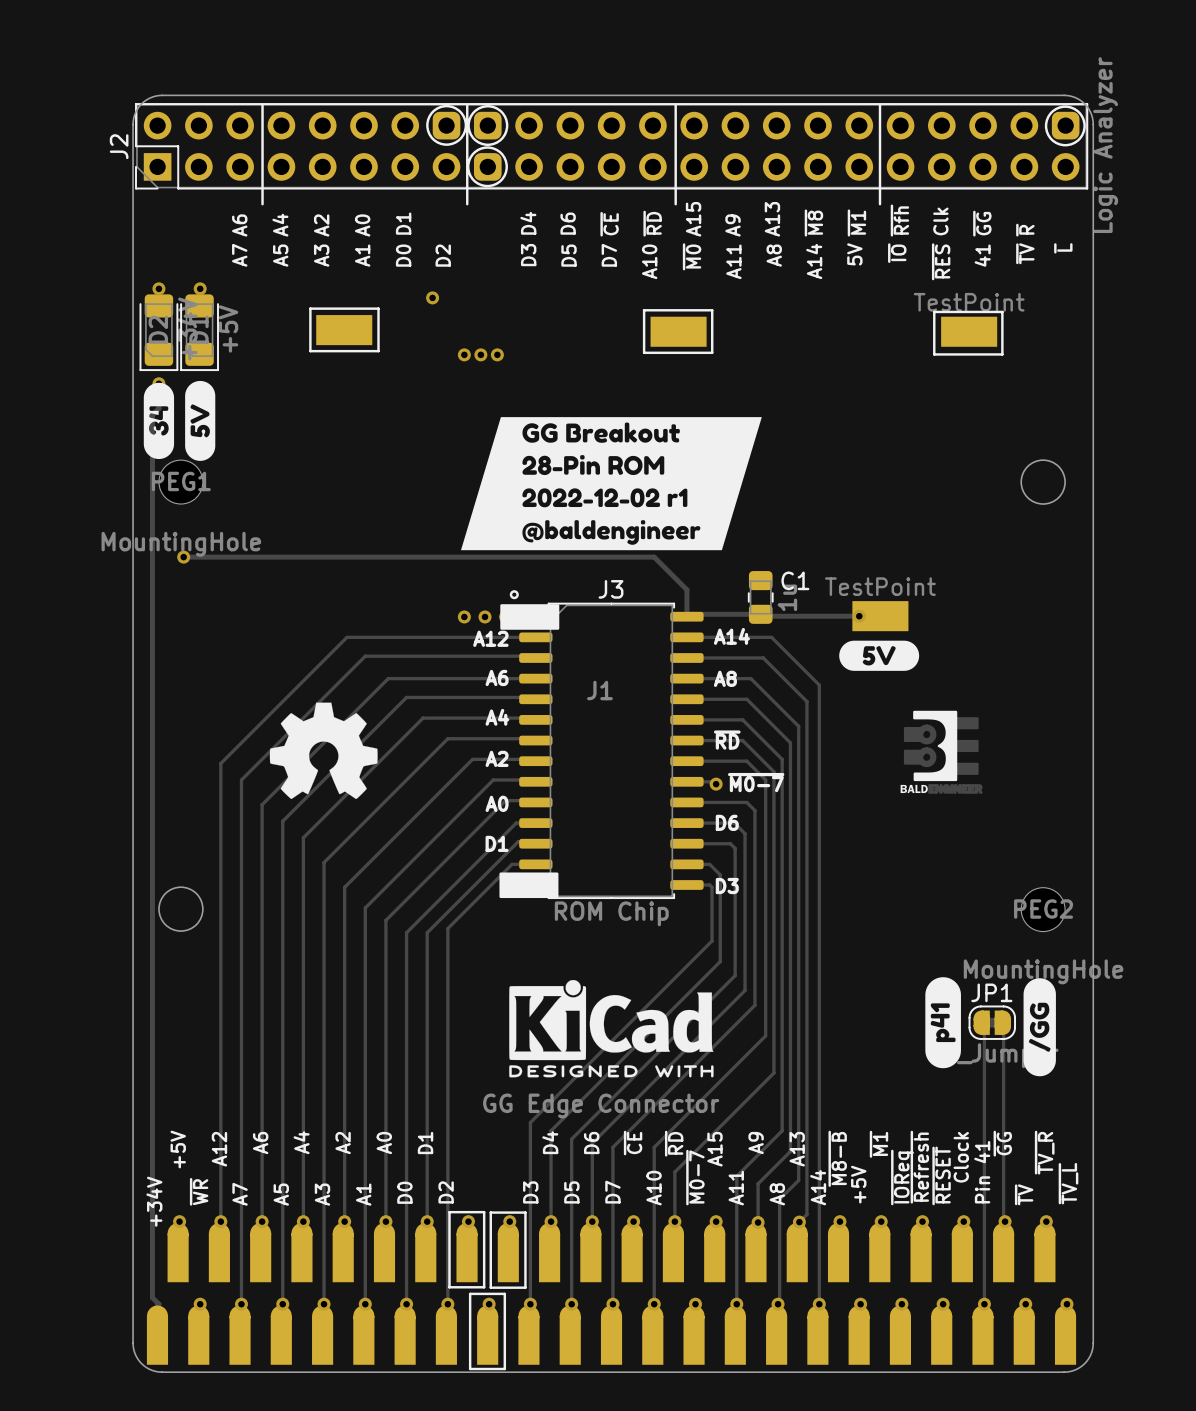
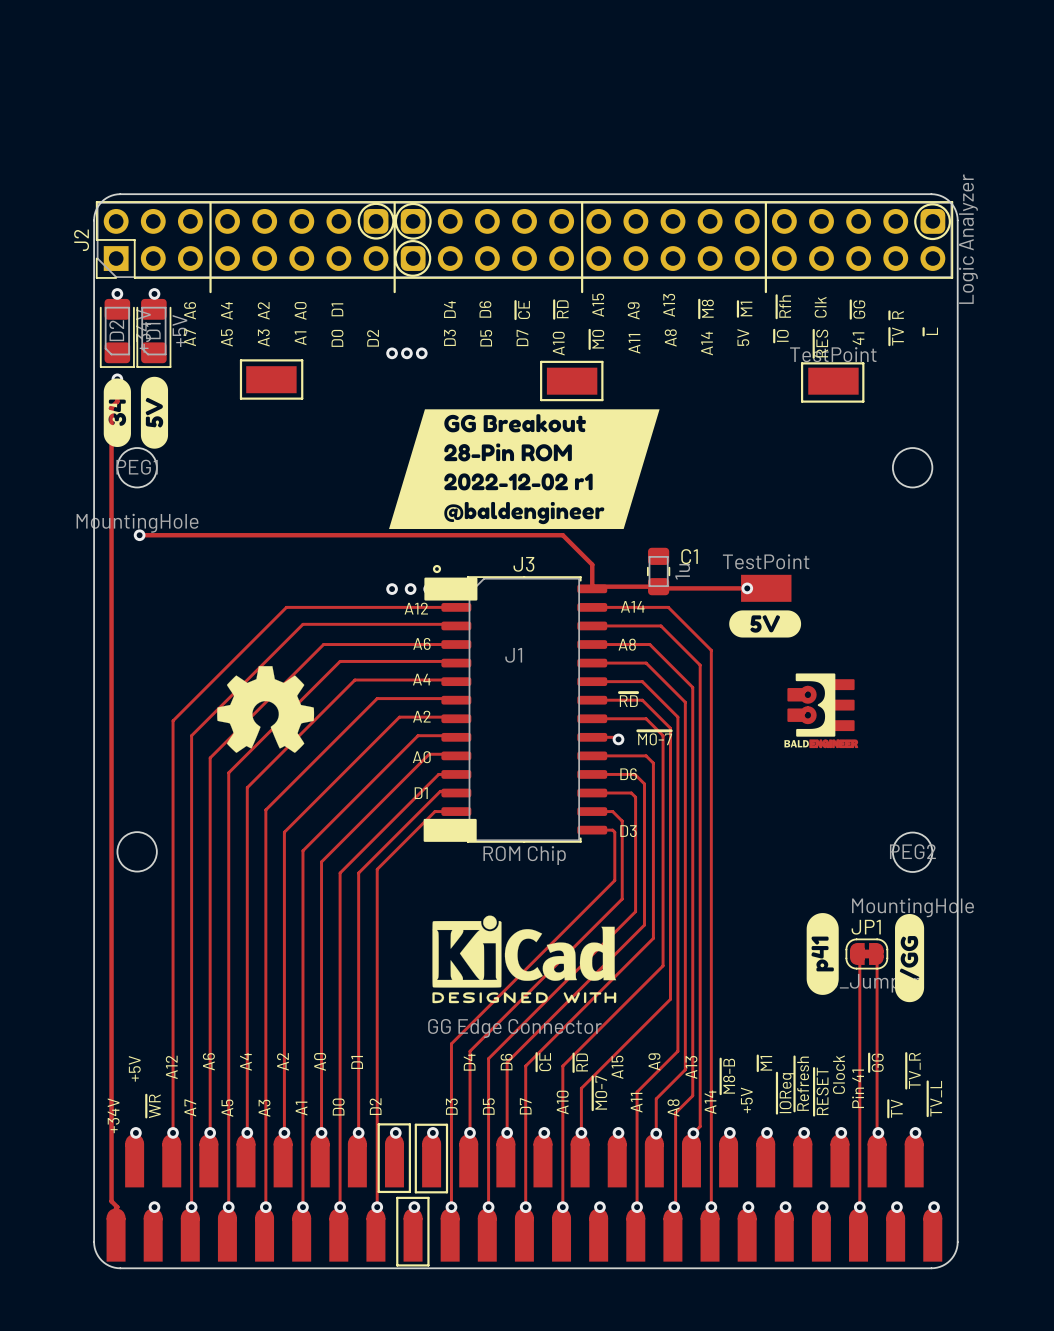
line: (262, 104) (262, 187) -> (210, 217) (210, 292)
drawing: [426, 104, 509, 188] -> none
line: (467, 104) (467, 187) -> (394, 217) (394, 292)
line: (675, 104) (675, 187) -> (582, 217) (582, 292)
line: (880, 104) (880, 187) -> (765, 217) (765, 292)
drawing position: (1065, 125) -> (932, 221)
J2 position: (611, 146) -> (524, 239)
drawing: none -> [357, 202, 432, 277]
board edge: (133, 207) (133, 118) (137, 109) (144, 101) (152, 97) (162, 95) (1067, 95) (1076, 98) (1084, 103) (1092, 118) (1093, 207) -> (94, 220) (95, 211) (101, 201) (111, 195) (120, 194) (931, 194) (942, 196) (950, 201) (955, 209) (957, 220)
text position: A15 (693, 219) -> A15 (598, 305)
text position: A13 (772, 219) -> A13 (669, 305)
text position: ~{Rfh} (899, 220) -> ~{Rfh} (783, 306)
text position: Clk (940, 221) -> Clk (820, 307)
text position: D1 (403, 223) -> D1 (337, 309)
text position: D4 (528, 223) -> D4 (449, 309)
text position: D6 (568, 223) -> D6 (485, 309)
text position: ~{RD} (652, 223) -> ~{RD} (561, 309)
text position: ~{M8} (813, 223) -> ~{M8} (706, 308)
text position: ~{M1} (856, 223) -> ~{M1} (745, 308)
text position: ~{GG} (982, 223) -> ~{GG} (858, 309)
text position: ~{CE} (609, 224) -> ~{CE} (522, 309)
text position: A6 (239, 225) -> A6 (190, 310)
text position: A4 (280, 225) -> A4 (226, 310)
text position: A2 (321, 225) -> A2 (263, 310)
text position: A0 (362, 225) -> A0 (300, 310)
text position: A9 (732, 225) -> A9 (633, 310)
text position: ~{R} (1025, 230) -> ~{R} (896, 315)
text position: ~{L} (1063, 248) -> ~{L} (930, 331)
text position: ~{IO} (897, 253) -> ~{IO} (781, 336)
text position: ~{TV} (1025, 253) -> ~{TV} (896, 336)
text position: 5V (854, 254) -> 5V (743, 337)
text position: A7 (239, 255) -> A7 (190, 337)
text position: A5 (280, 255) -> A5 (226, 337)
text position: A3 (321, 255) -> A3 (263, 338)
text position: A1 (362, 255) -> A1 (300, 338)
text position: D0 (403, 255) -> D0 (337, 338)
text position: D2 (443, 255) -> D2 (373, 338)
text position: D3 (528, 255) -> D3 (449, 337)
text position: D5 (569, 255) -> D5 (486, 338)
text position: D7 (609, 255) -> D7 (522, 337)
text position: A8 (774, 255) -> A8 (670, 337)
text position: 41 (982, 255) -> 41 (858, 338)
text position: ~{M0} (692, 256) -> ~{M0} (596, 339)
text position: A10 (649, 261) -> A10 (558, 343)
text position: A11 (733, 261) -> A11 (634, 343)
text position: A14 (814, 261) -> A14 (707, 343)
text position: ~{RES} (941, 261) -> ~{RES} (820, 343)
via: (432, 297) -> none
line: (310, 308) (378, 308) (378, 351) (310, 351) (310, 308) -> (240, 360) (302, 360) (302, 398) (240, 398) (240, 360)
line: (644, 310) (712, 310) (712, 352) (644, 352) (644, 310) -> (541, 361) (602, 361) (602, 400) (541, 400) (541, 361)
line: (934, 311) (1002, 311) (1002, 354) (934, 354) (934, 311) -> (802, 363) (863, 363) (863, 401) (802, 401) (802, 363)
part position: (344, 330) -> (271, 379)
part position: (678, 331) -> (572, 381)
part position: (969, 331) -> (833, 381)

